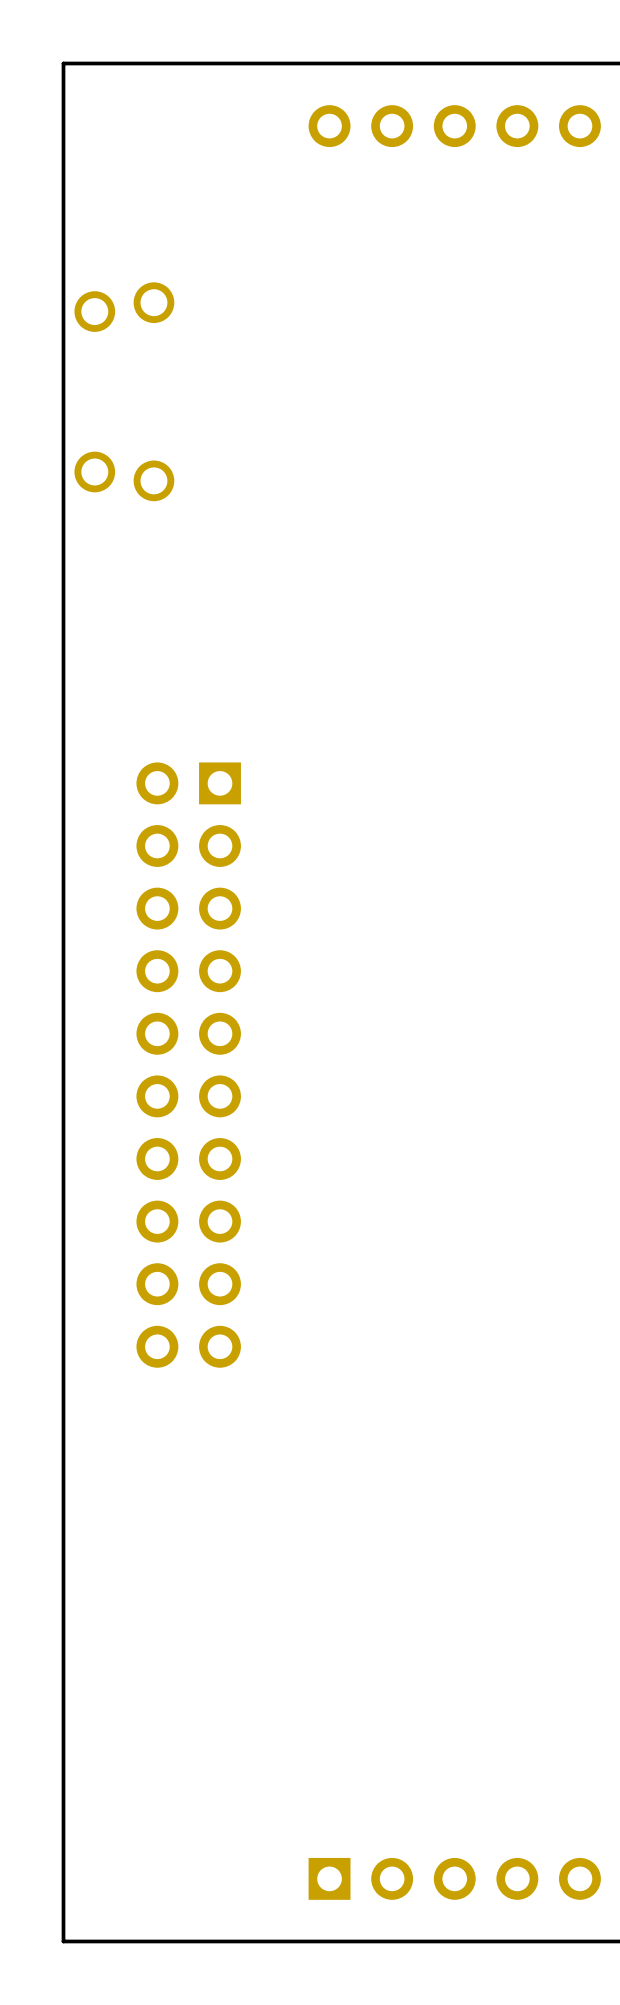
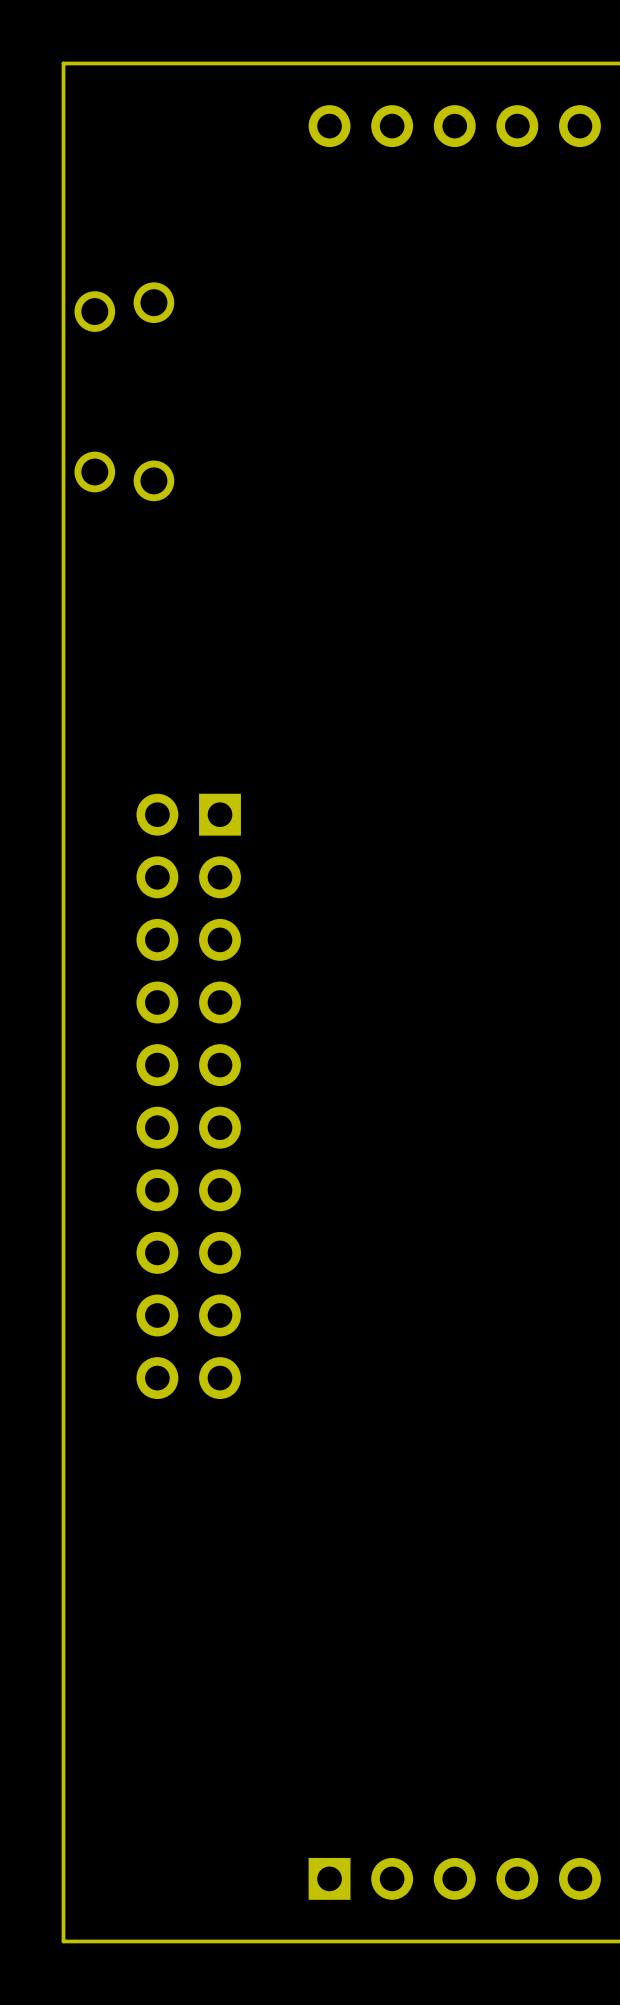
part position: (188, 1065) -> (188, 1096)

